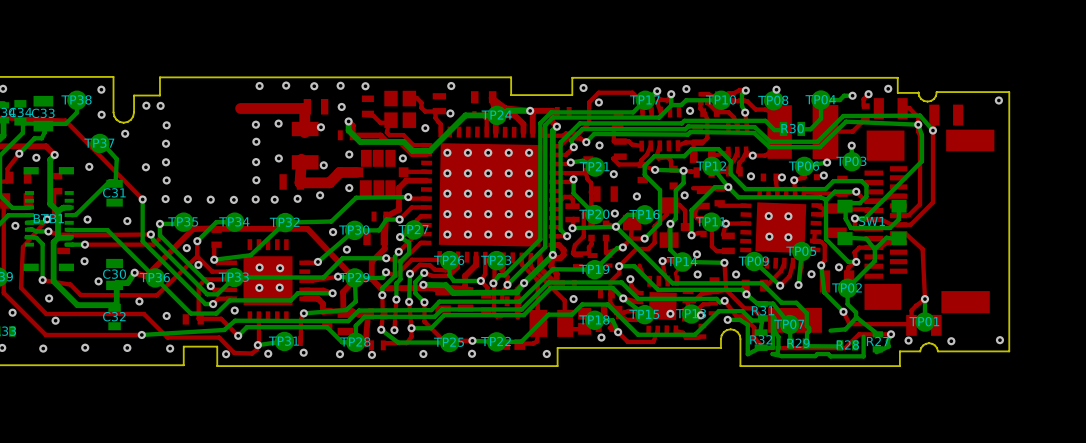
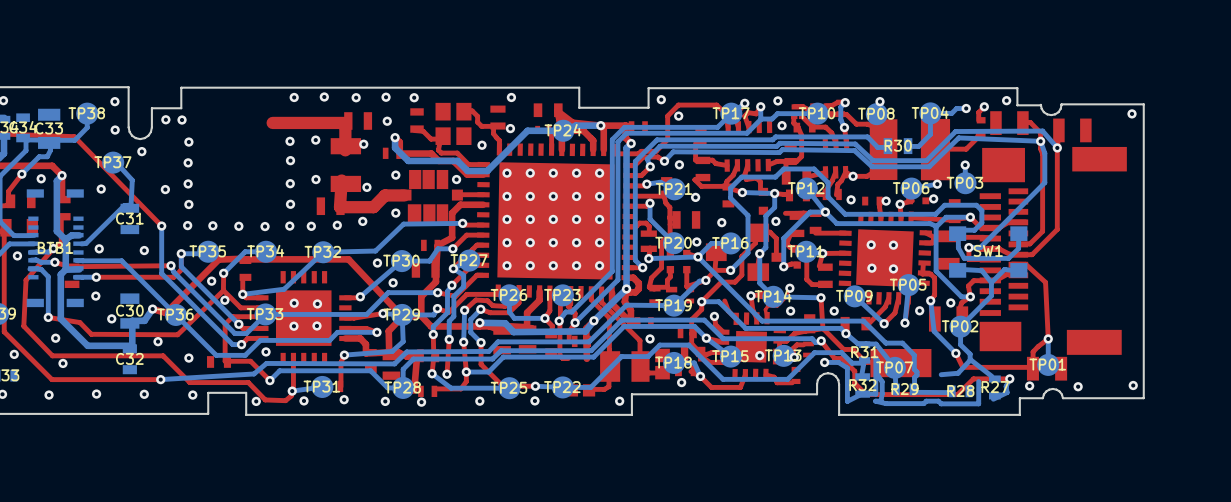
top track: none -> (62, 175) (62, 199)

